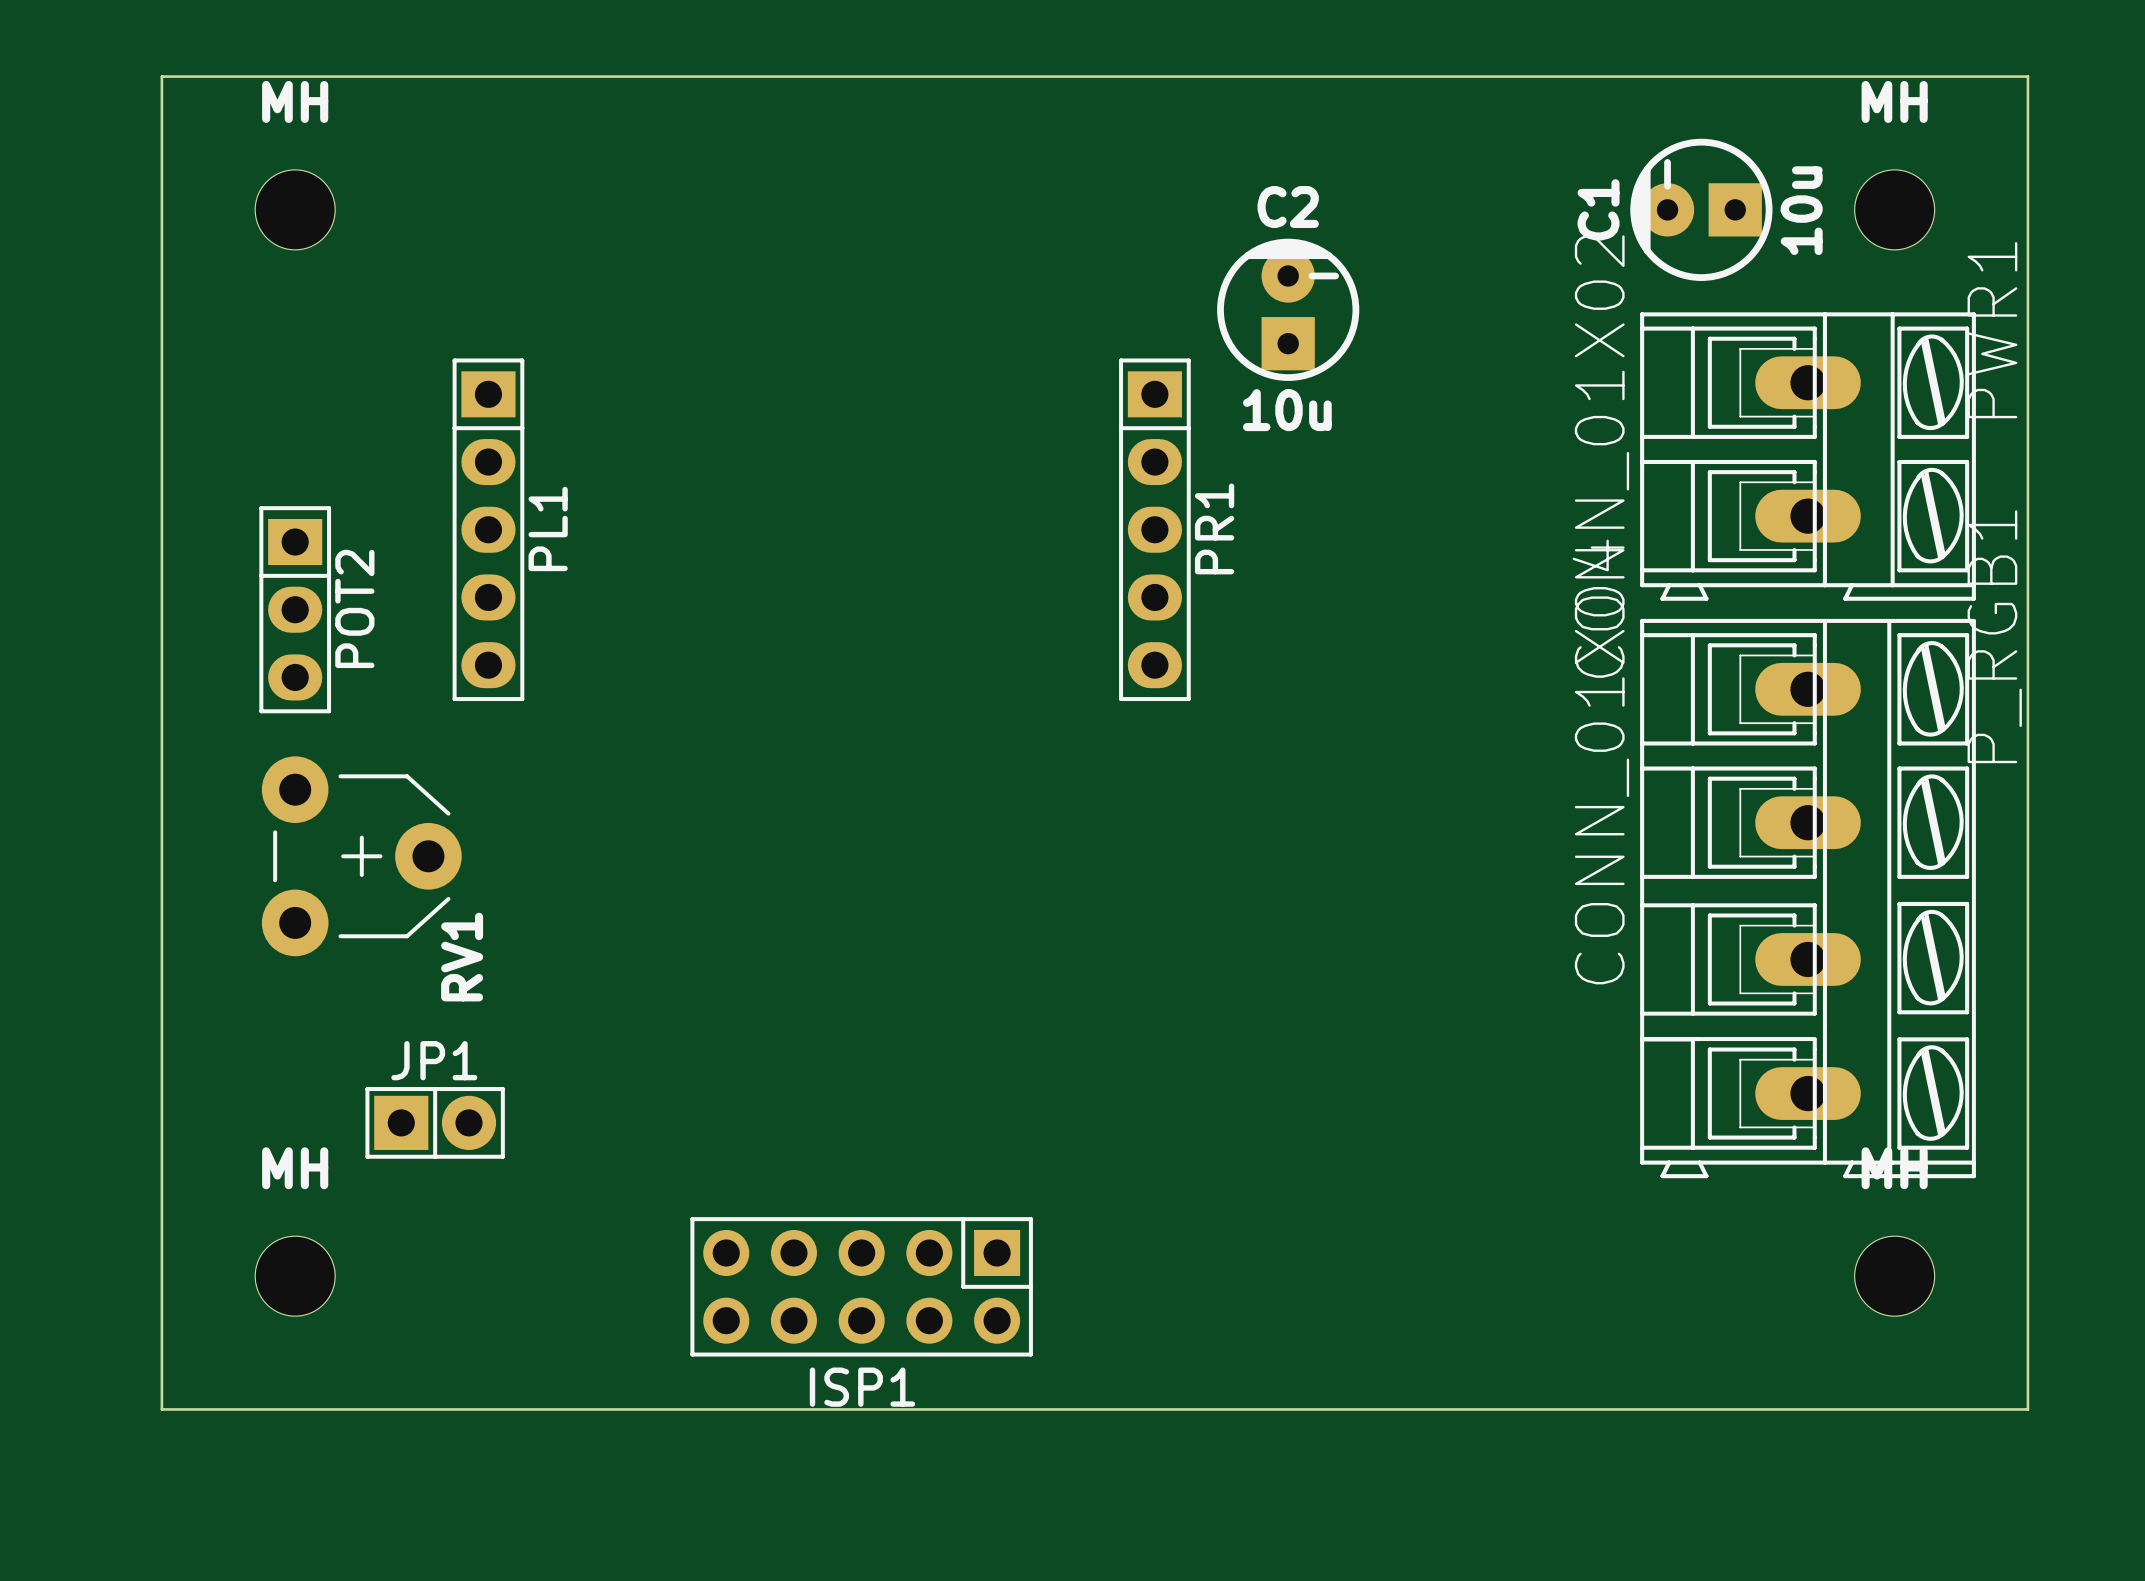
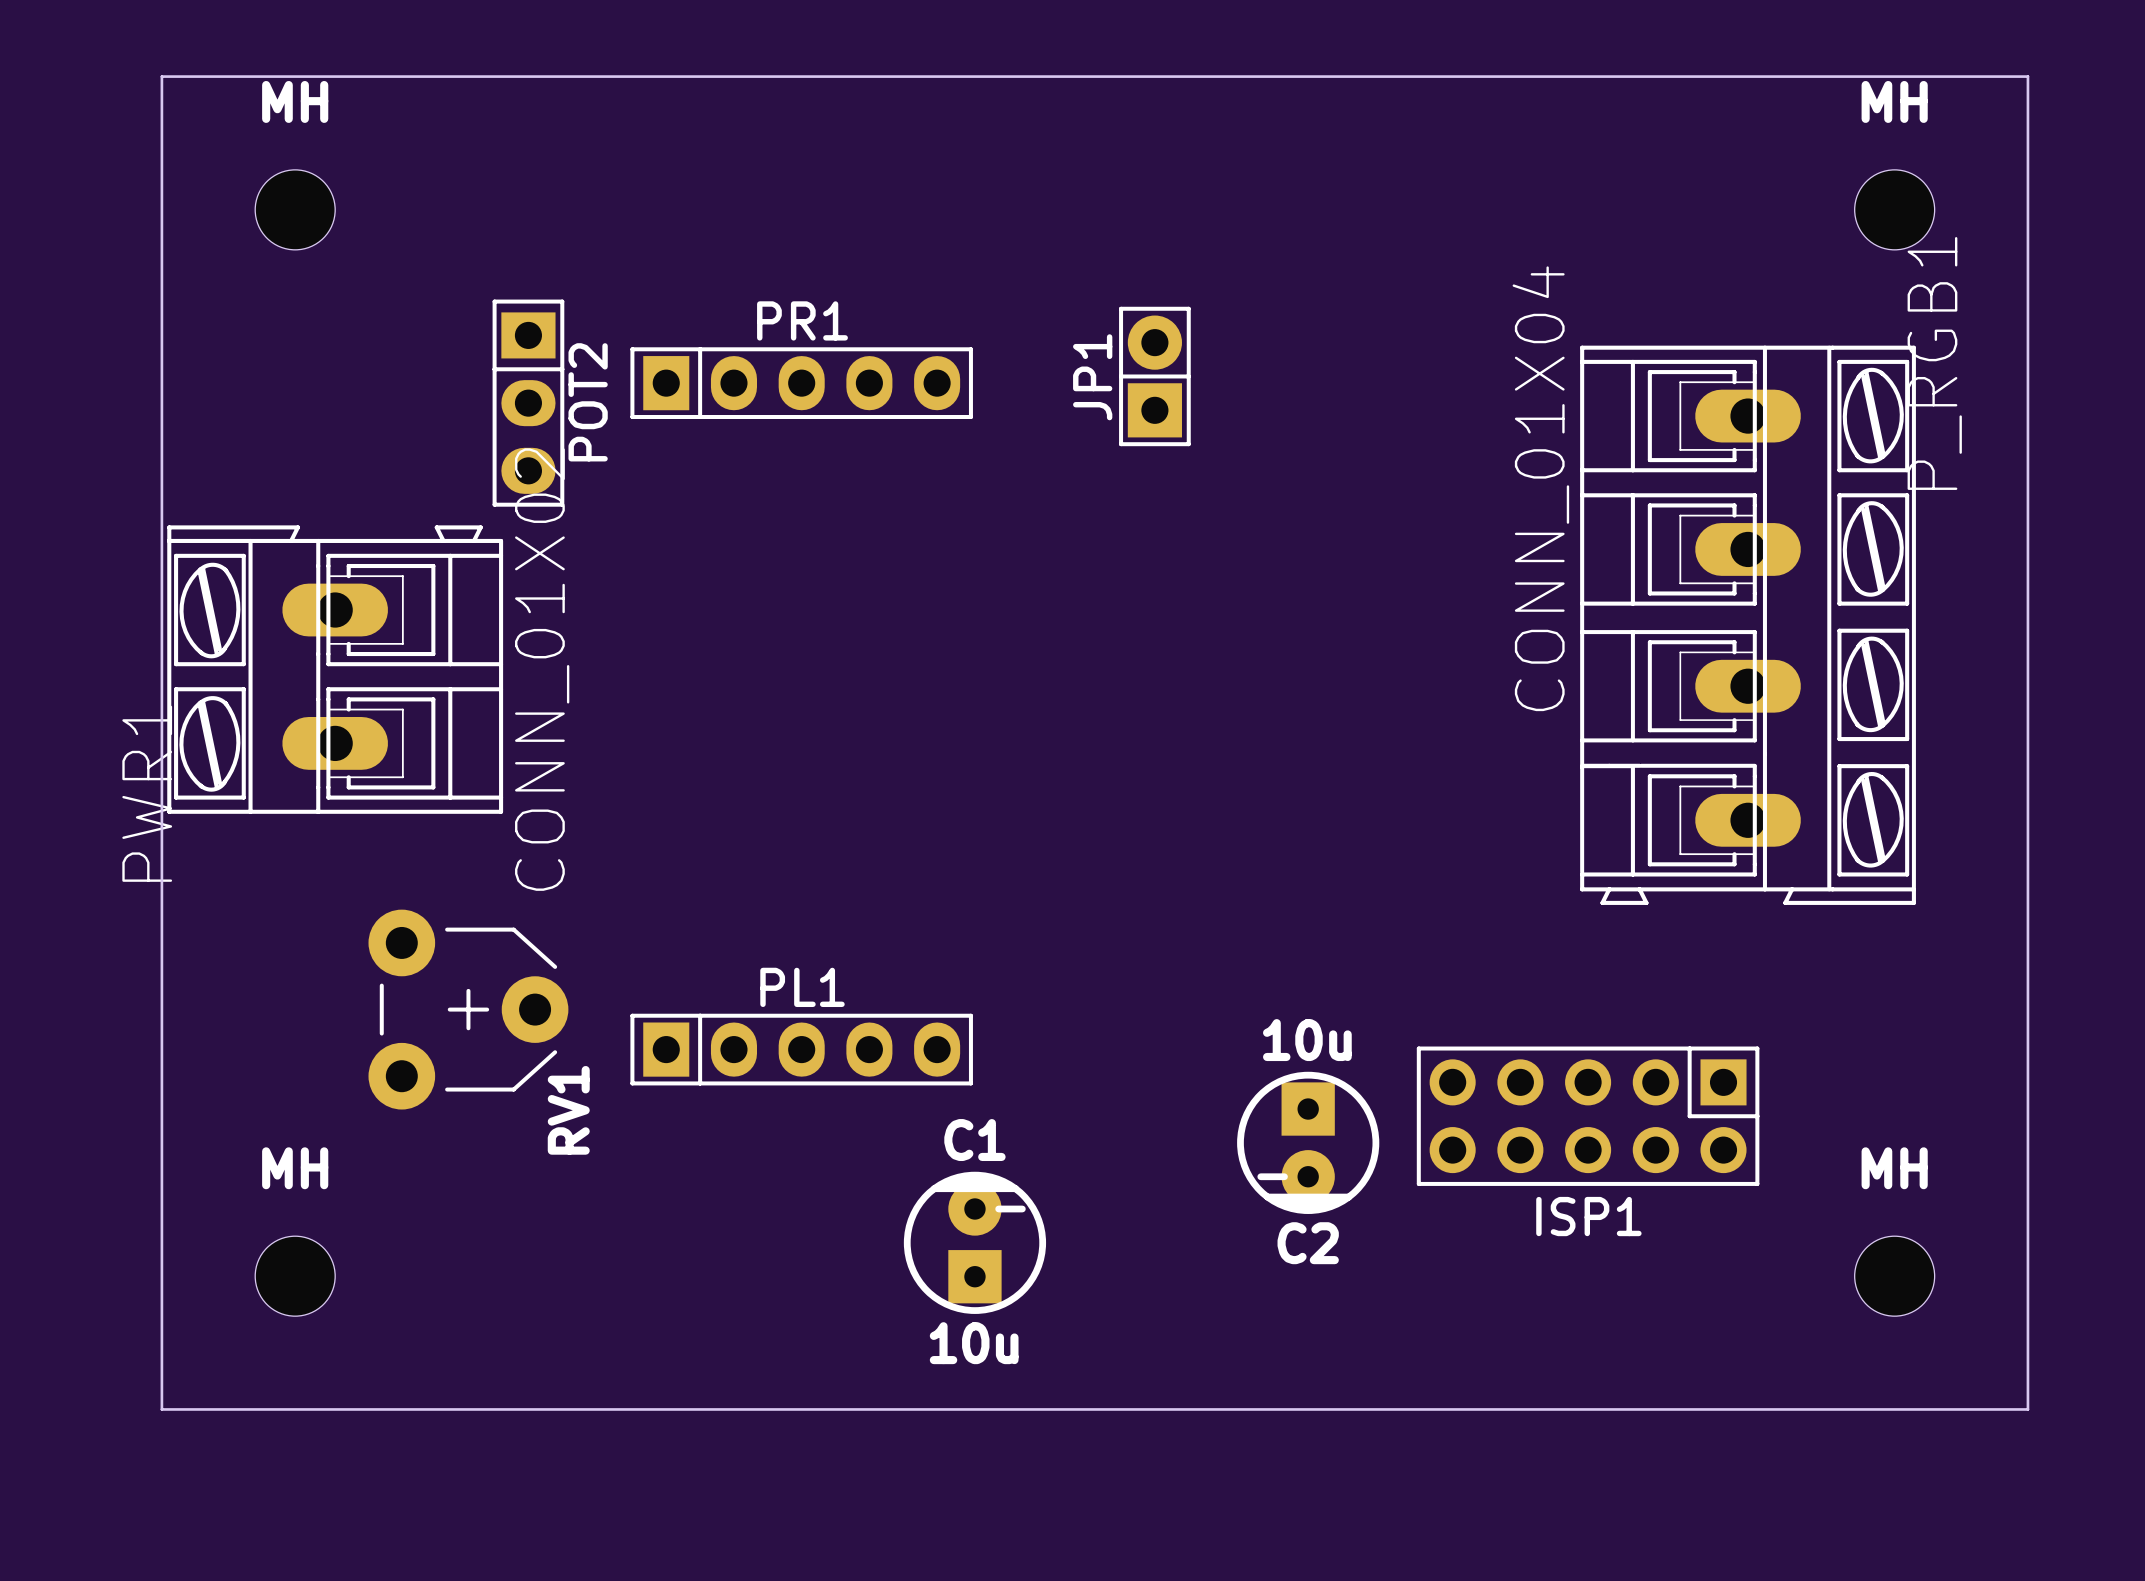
C1 rotation: 0° (1701, 209) -> 90° clockwise (974, 1242)
C1 position: (1701, 209) -> (974, 1242)
C2 rotation: 0° (1288, 309) -> 180° (1308, 1142)
C2 position: (1288, 309) -> (1308, 1142)
PWR1 rotation: 0° (1808, 456) -> 180° (335, 669)
PWR1 position: (1808, 456) -> (335, 669)
PL1 rotation: 0° (488, 529) -> 90° counterclockwise (801, 1049)
PL1 position: (488, 529) -> (801, 1049)
PR1 rotation: 0° (1154, 529) -> 90° counterclockwise (801, 383)
PR1 position: (1154, 529) -> (801, 383)
POT2 position: (295, 609) -> (528, 403)
RV1 position: (361, 856) -> (468, 1009)
P_RGB1 position: (1808, 898) -> (1748, 625)
JP1 rotation: 0° (435, 1122) -> 90° counterclockwise (1154, 376)
JP1 position: (435, 1122) -> (1154, 376)
ISP1 position: (861, 1286) -> (1588, 1116)

